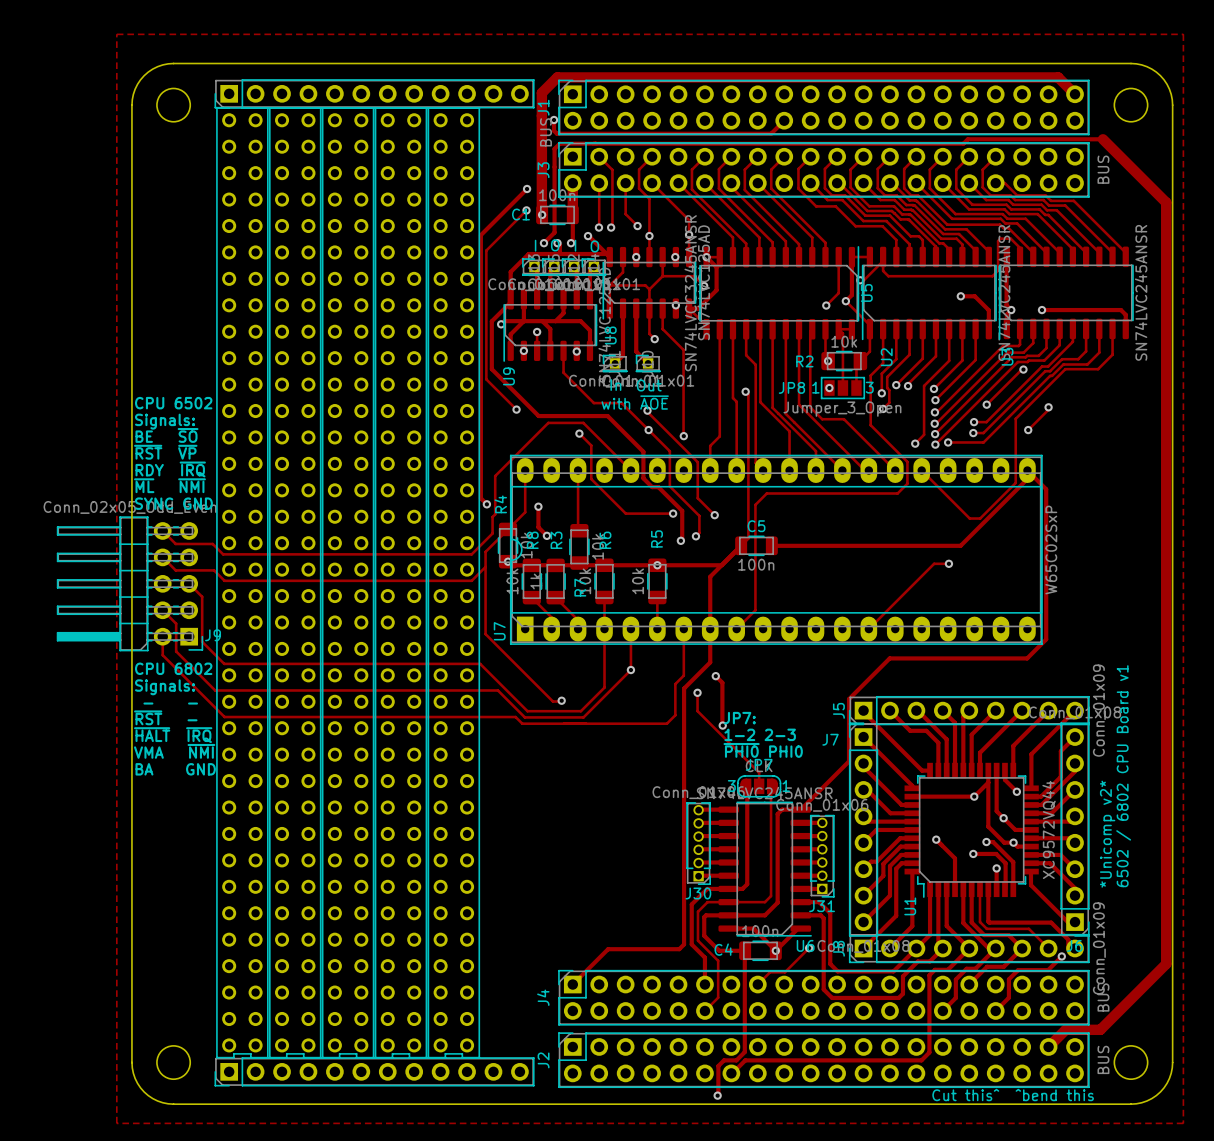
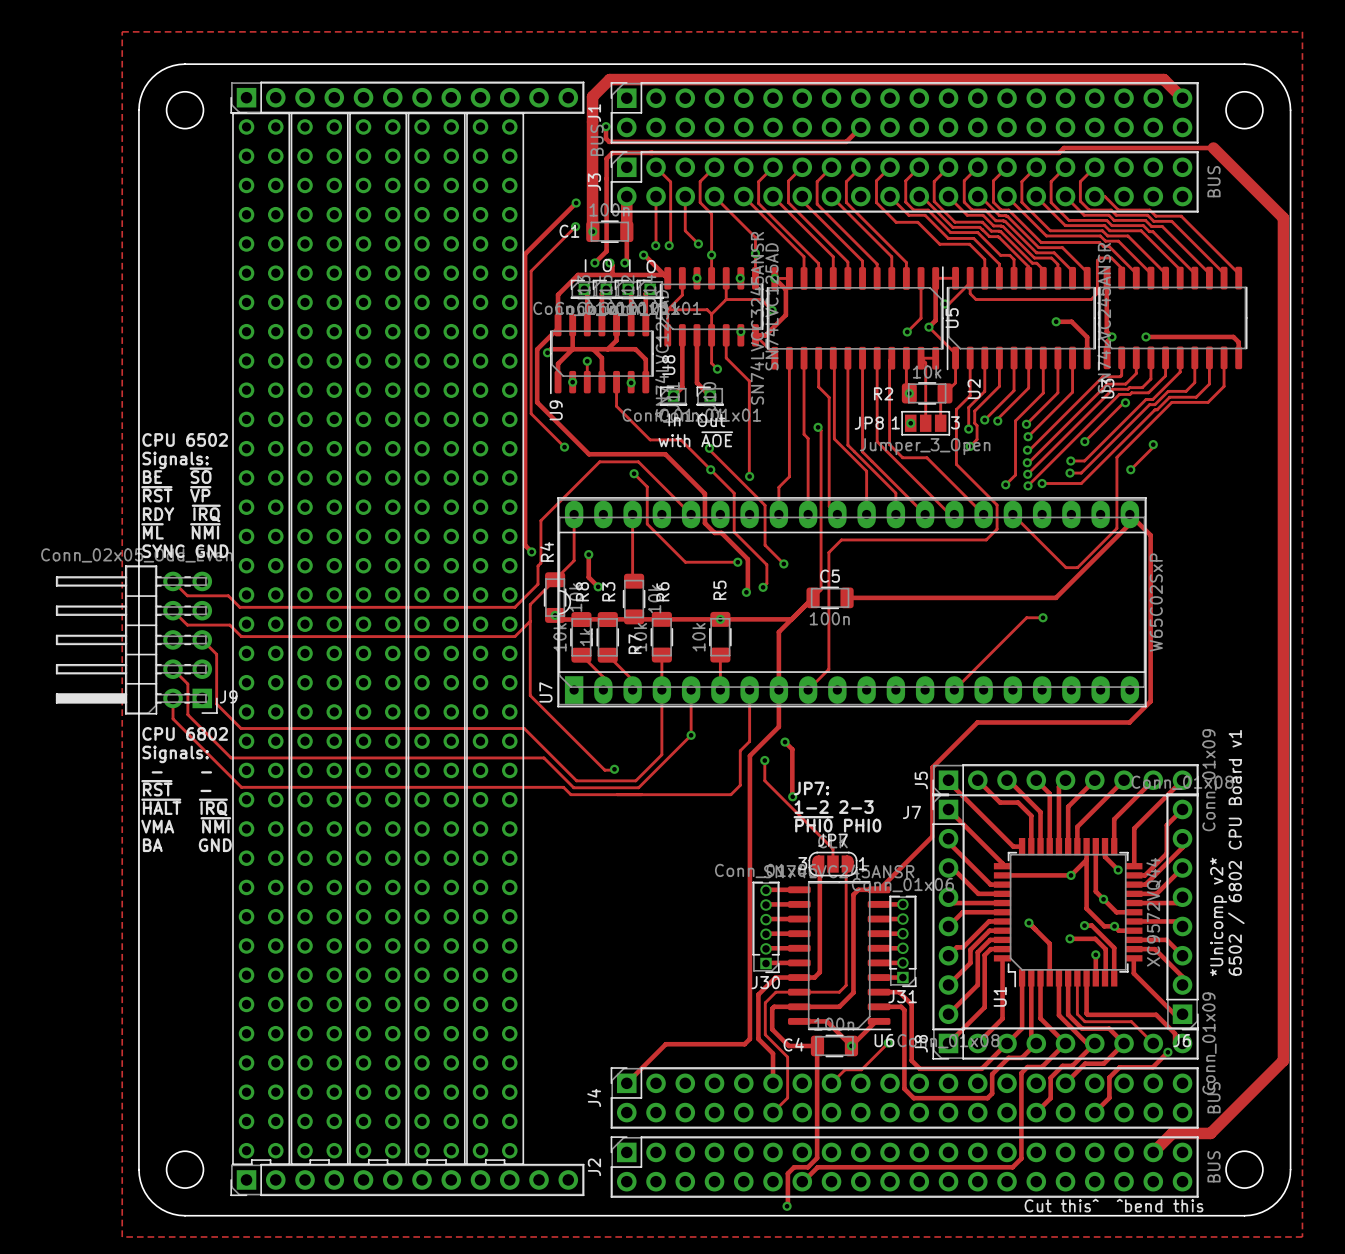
U3 value: SN74LVC245ANSR (1141, 292) -> none

